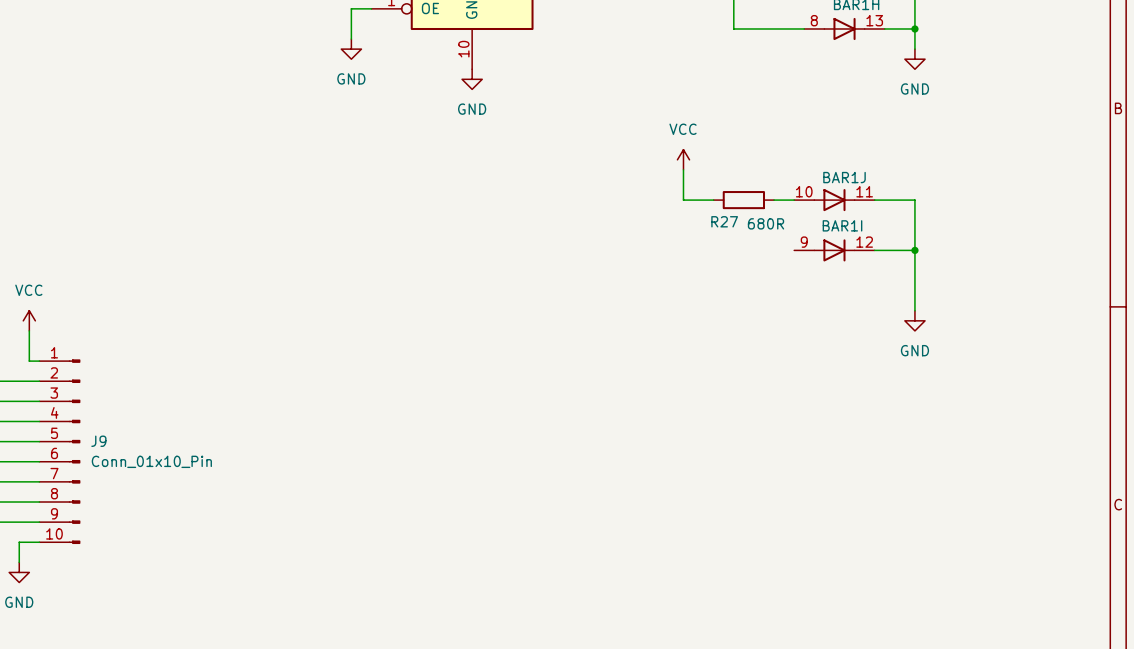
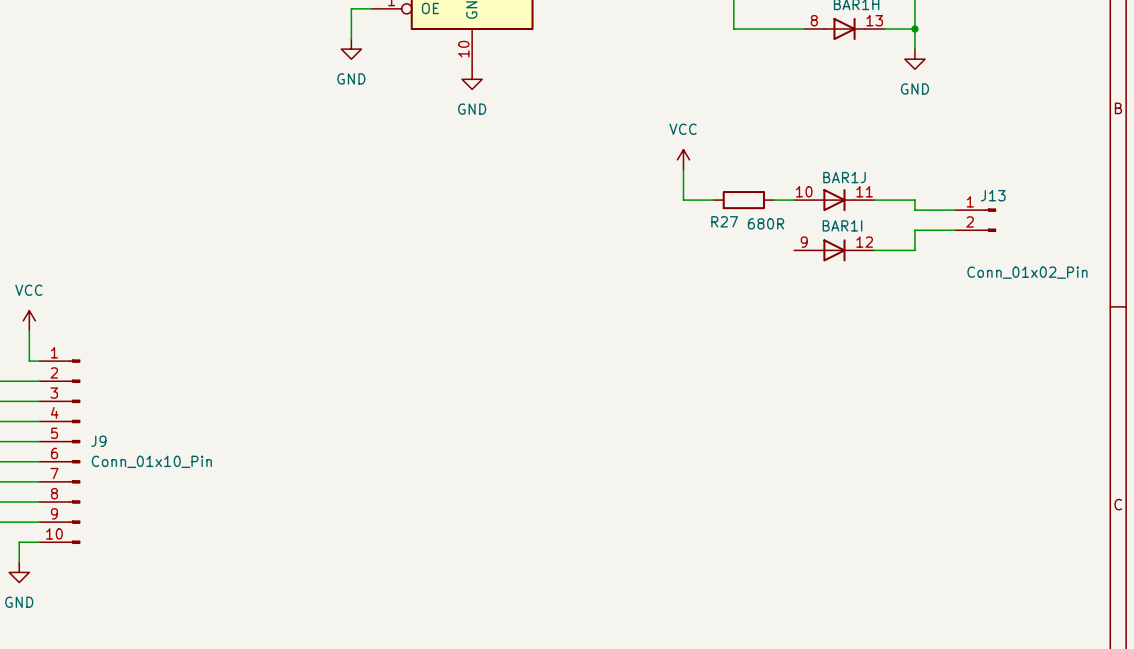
wire: (914, 210) (914, 230) -> (914, 210) (955, 210)
J13: none -> Conn_01x02_Pin (975, 220)
wire: none -> (914, 230) (955, 230)
wire: (914, 250) (914, 310) -> none
junction: (914, 250) -> none
power symbol: GND (914, 320) -> none

